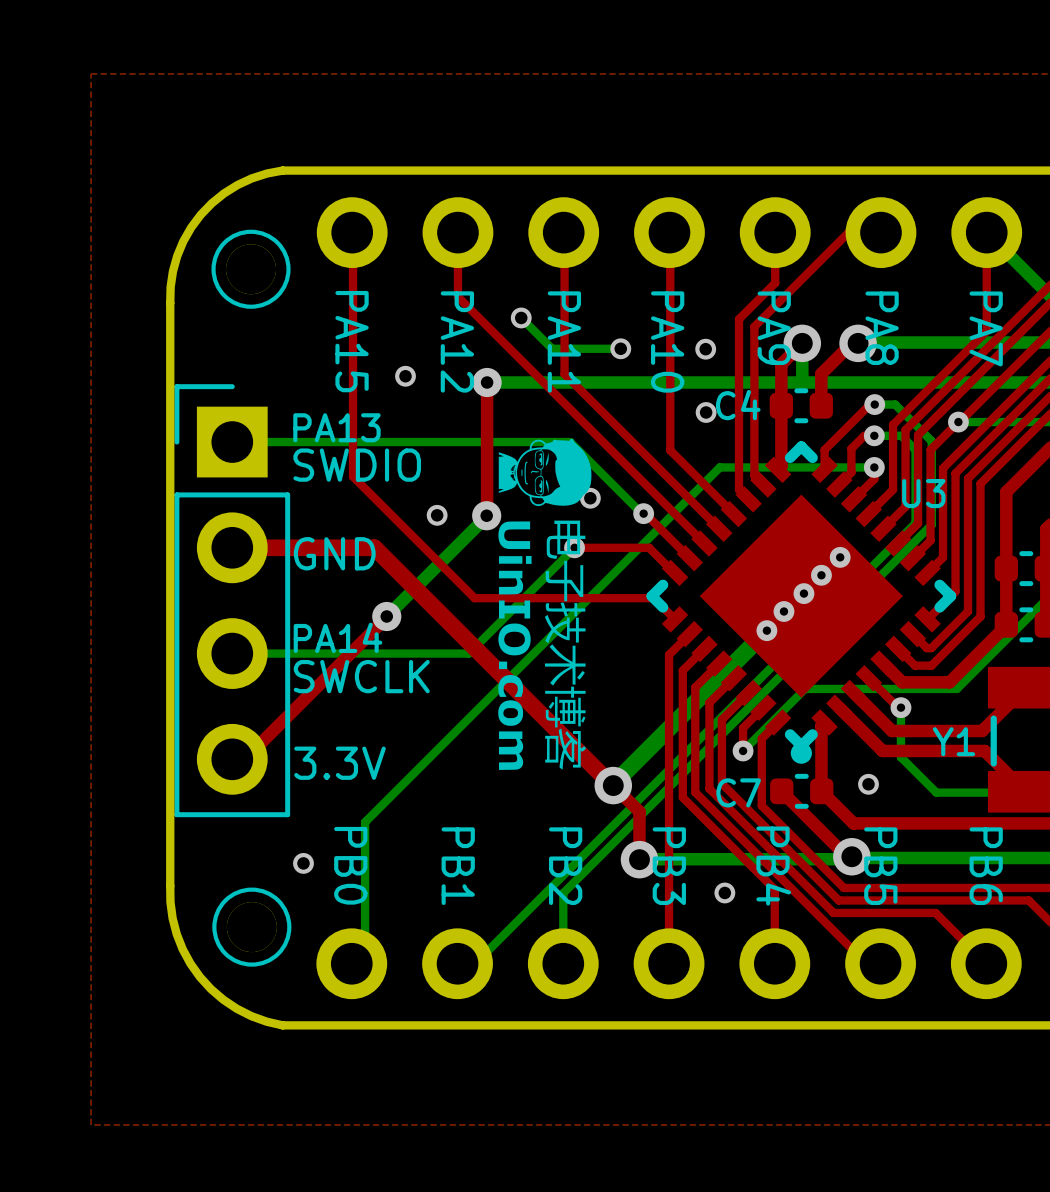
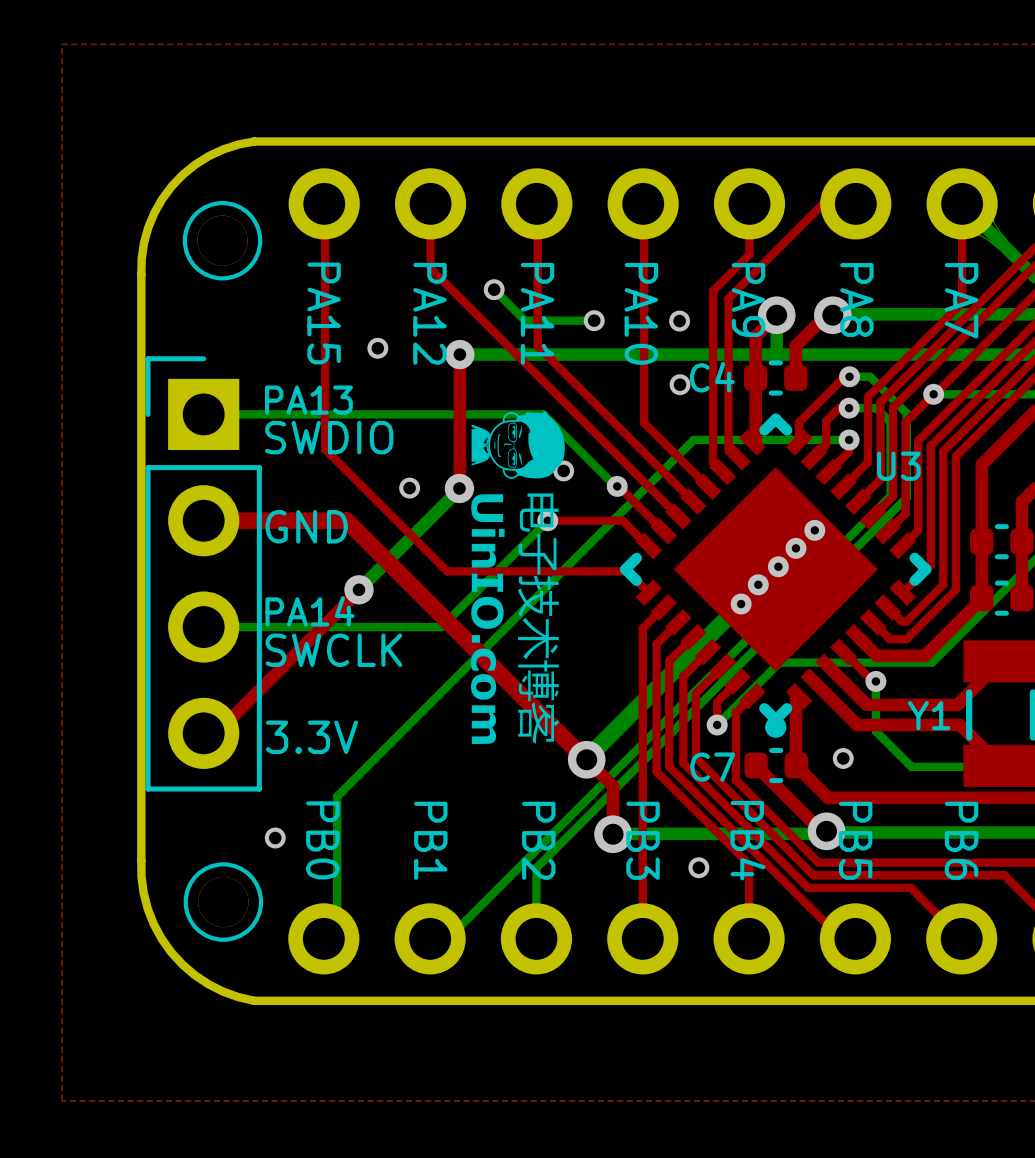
bottom zone outline: none -> (993, 221) (1006, 239) (997, 248) (979, 235)

